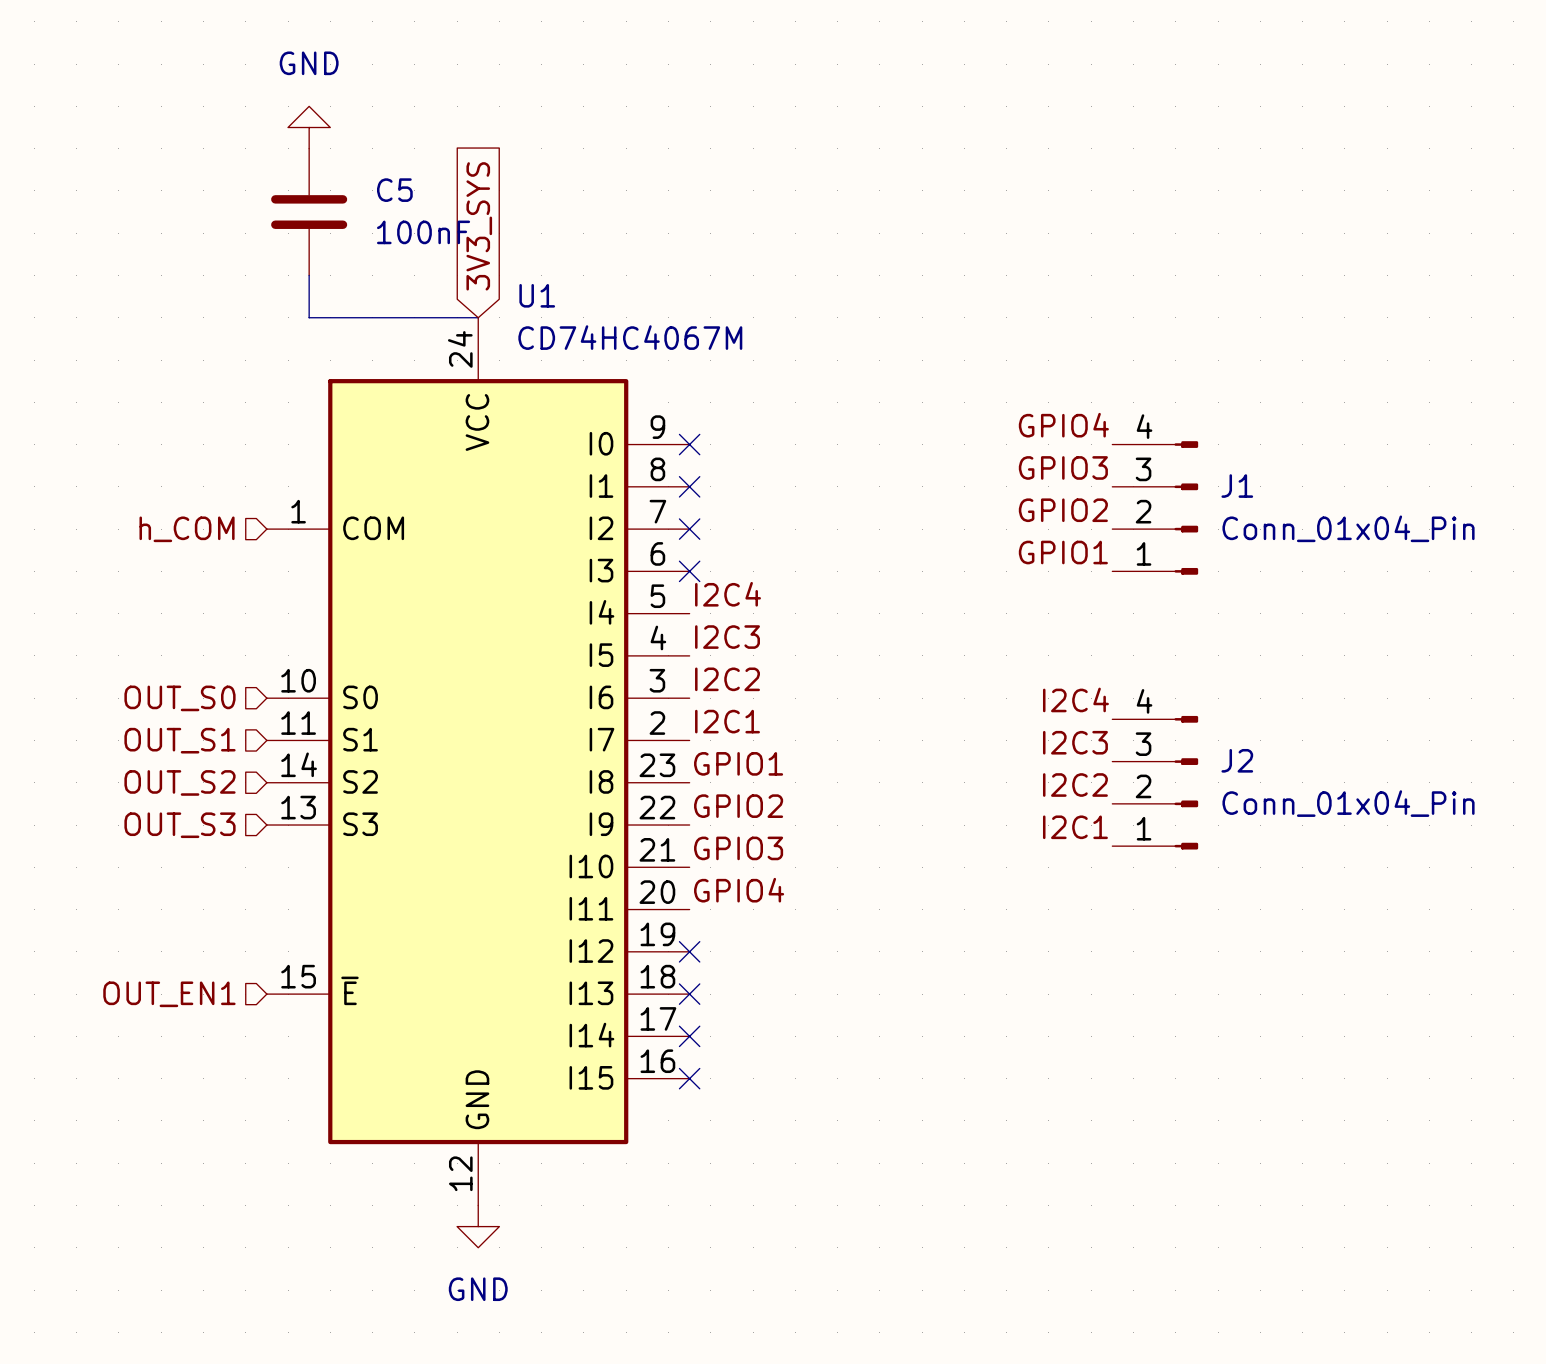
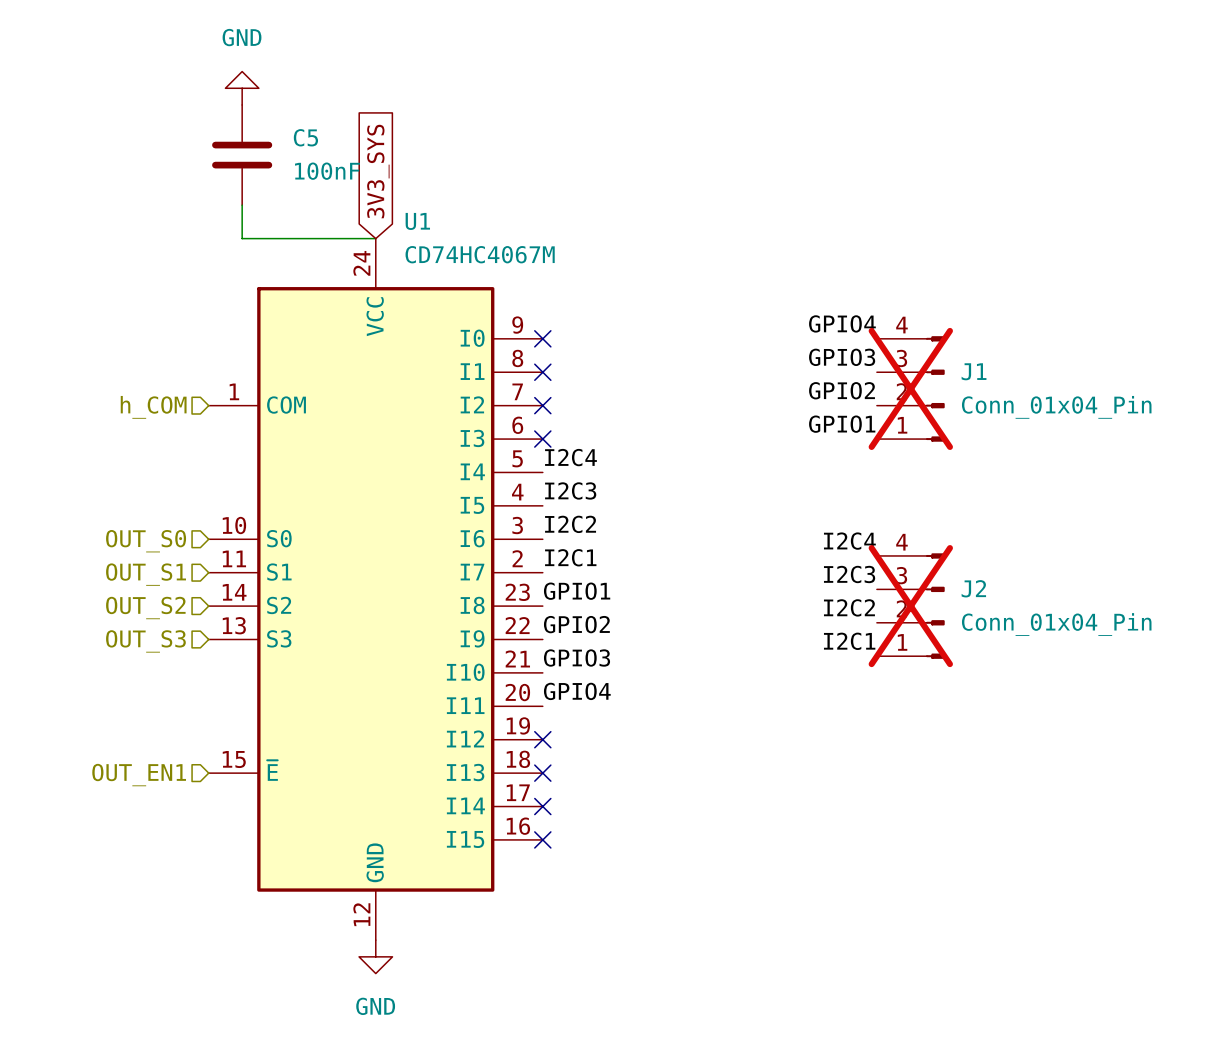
J1 do-not-place cross: none -> (910, 388)
J2 do-not-place cross: none -> (910, 606)

